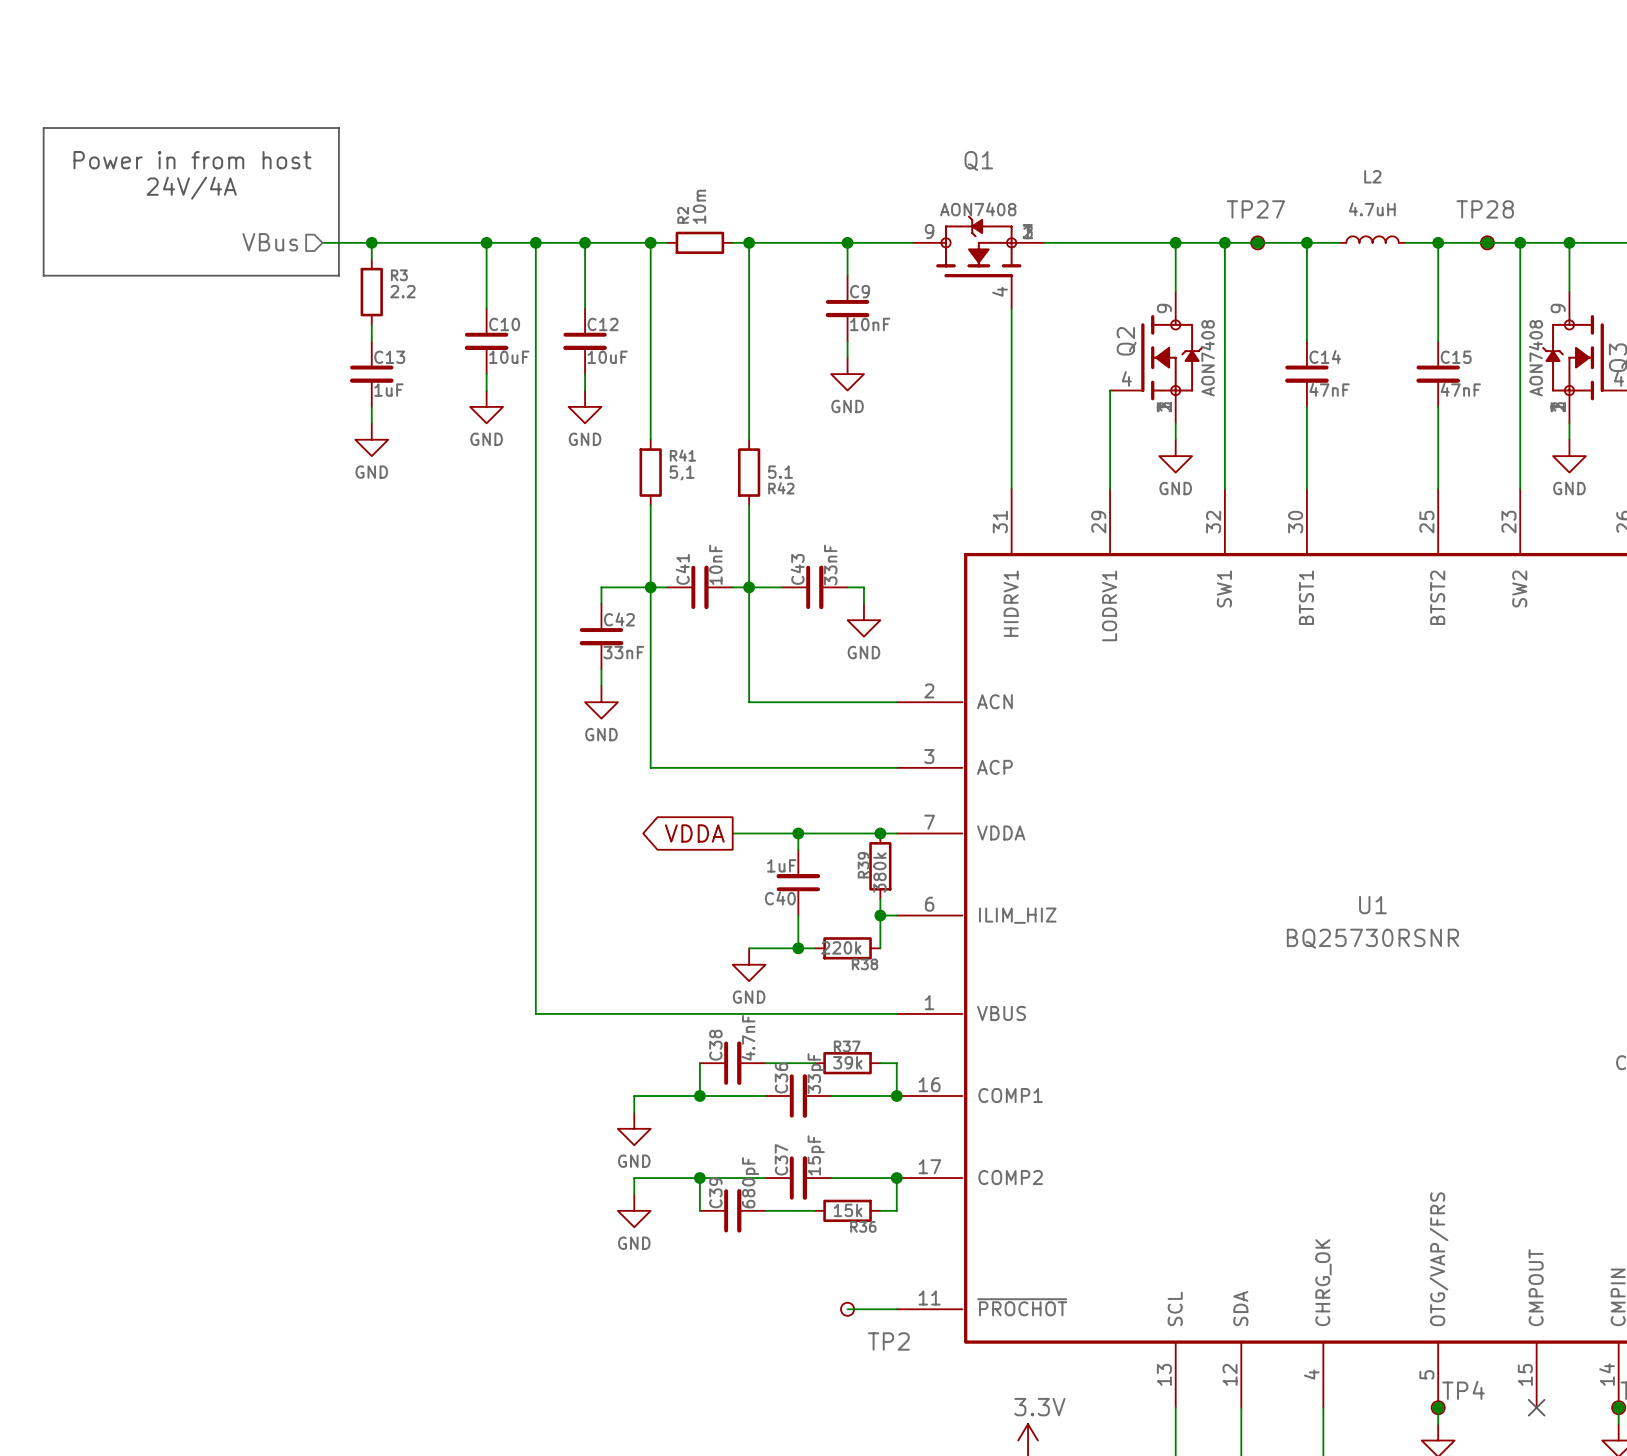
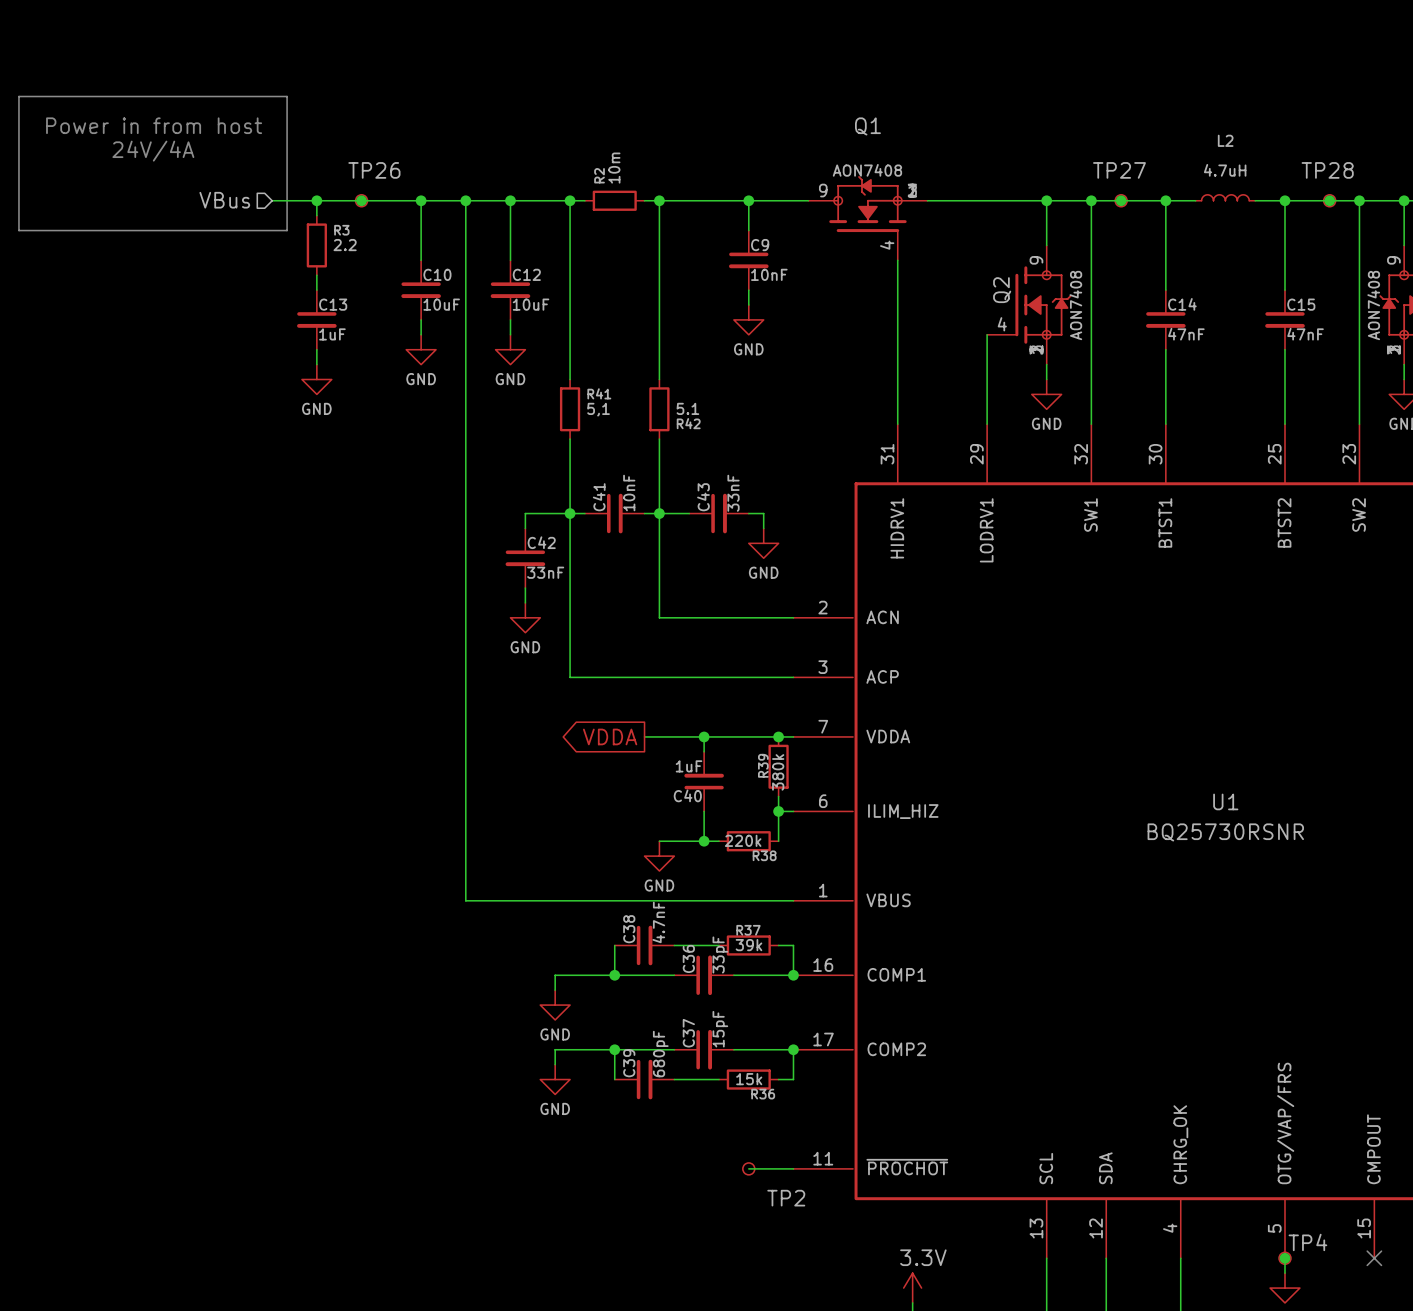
junction: none -> (361, 200)
TP26: none -> (361, 200)

